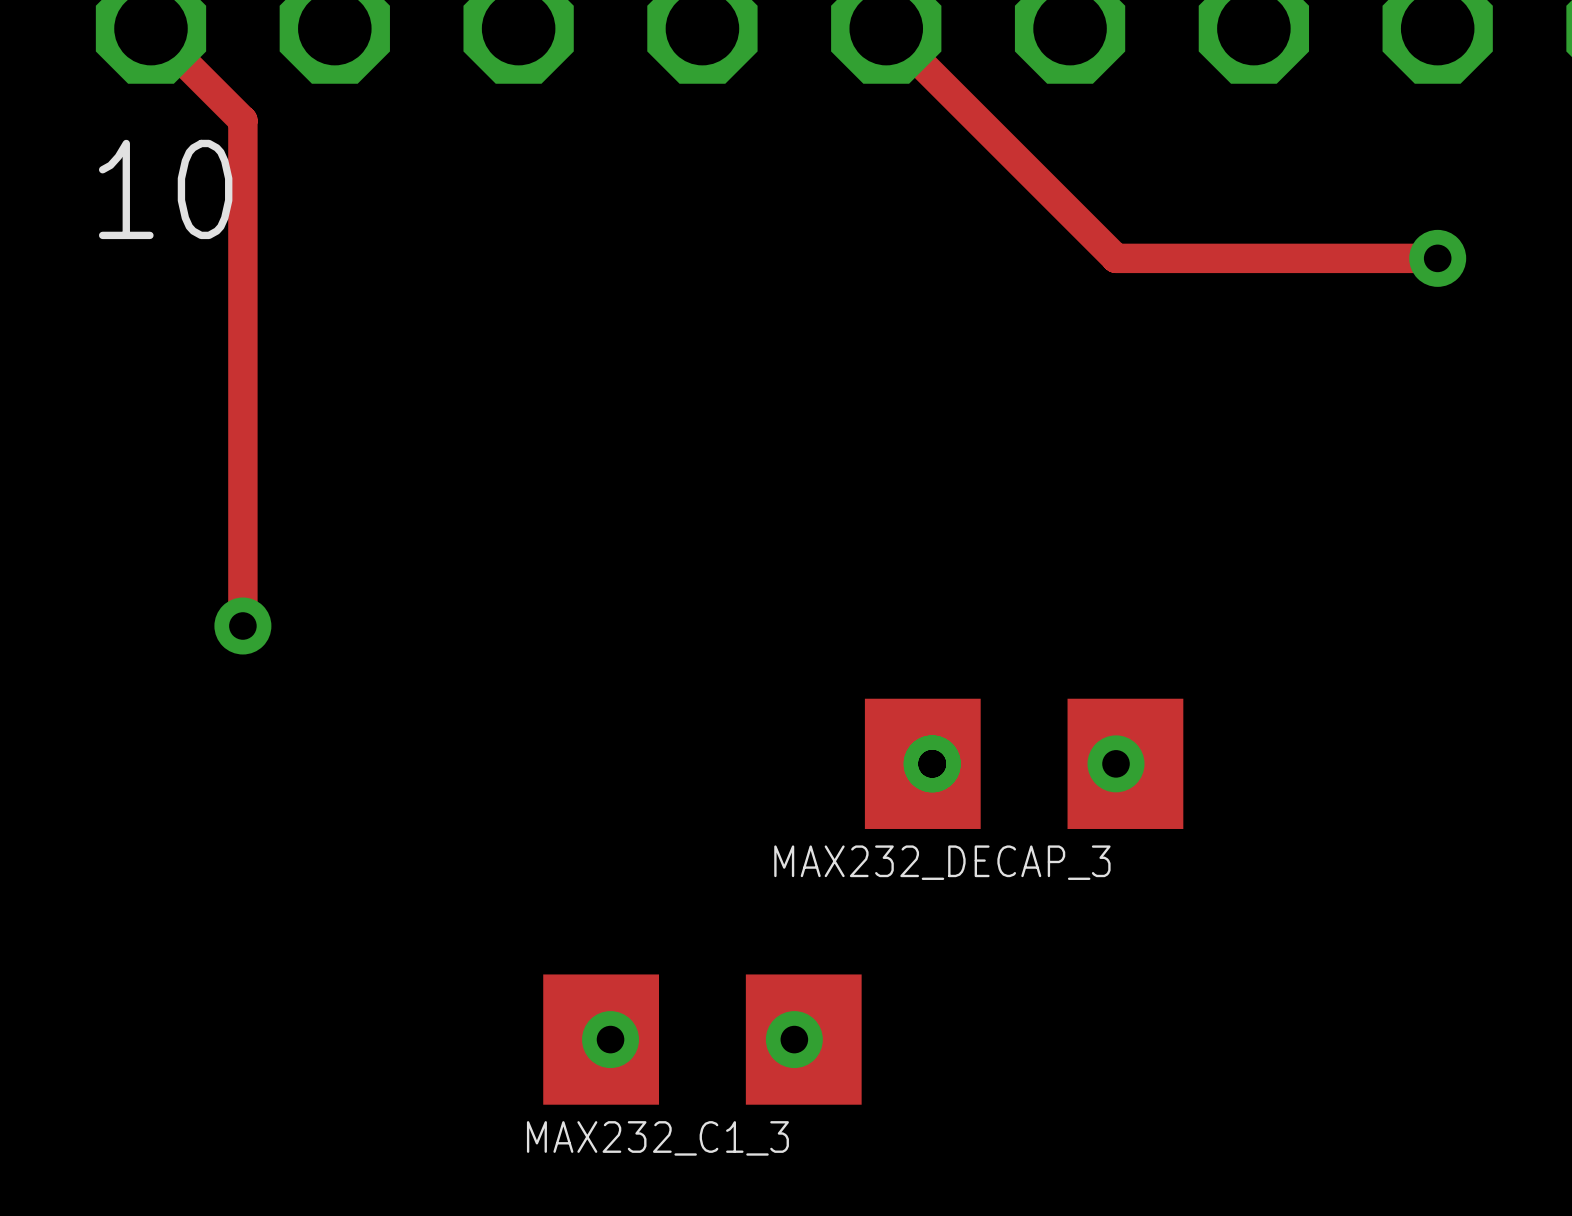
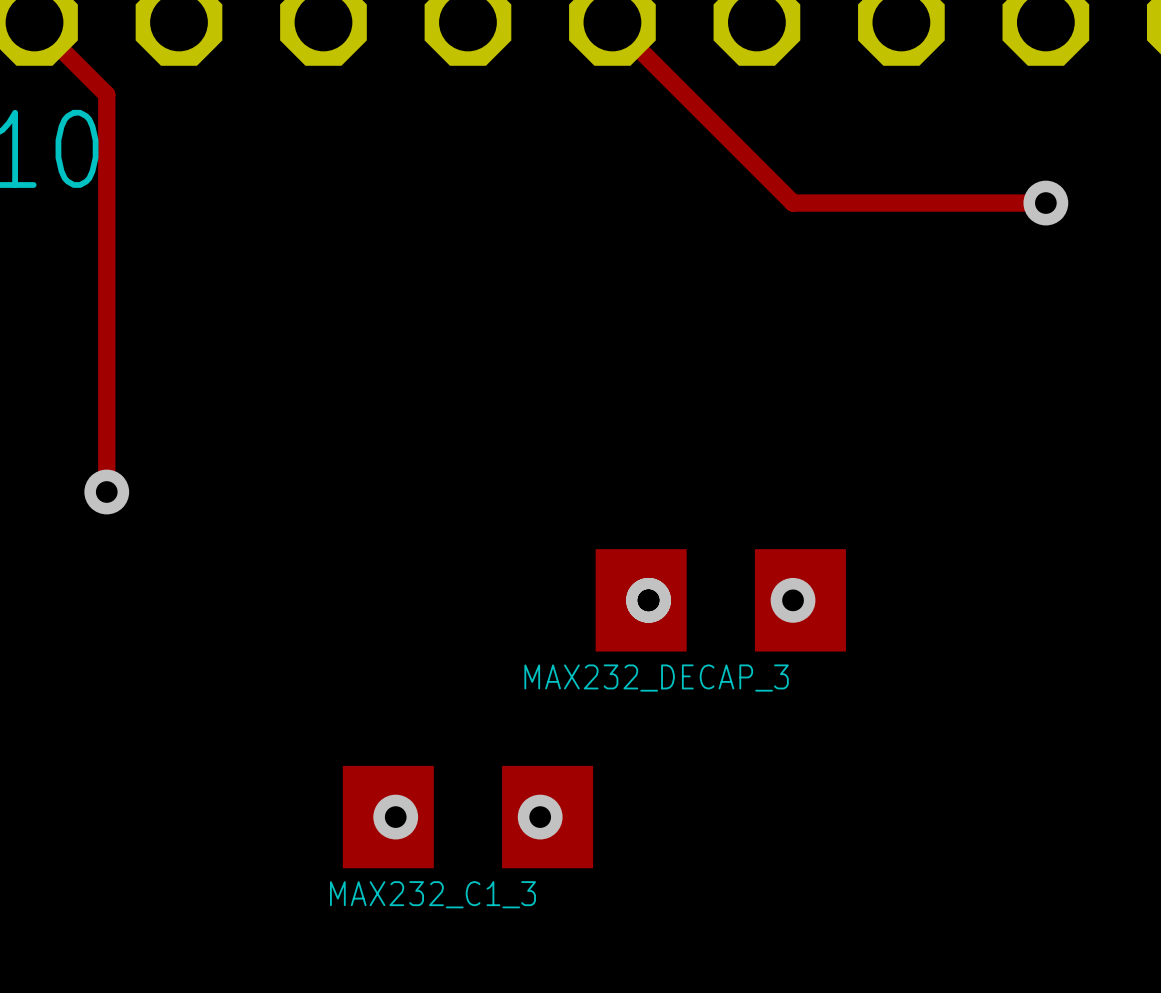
track width: thick (150, 28) (242, 120) (242, 626) -> thin (34, 22) (106, 94) (106, 492)
track width: thick (886, 28) (1116, 258) (1437, 258) -> thin (612, 22) (793, 203) (1045, 203)

